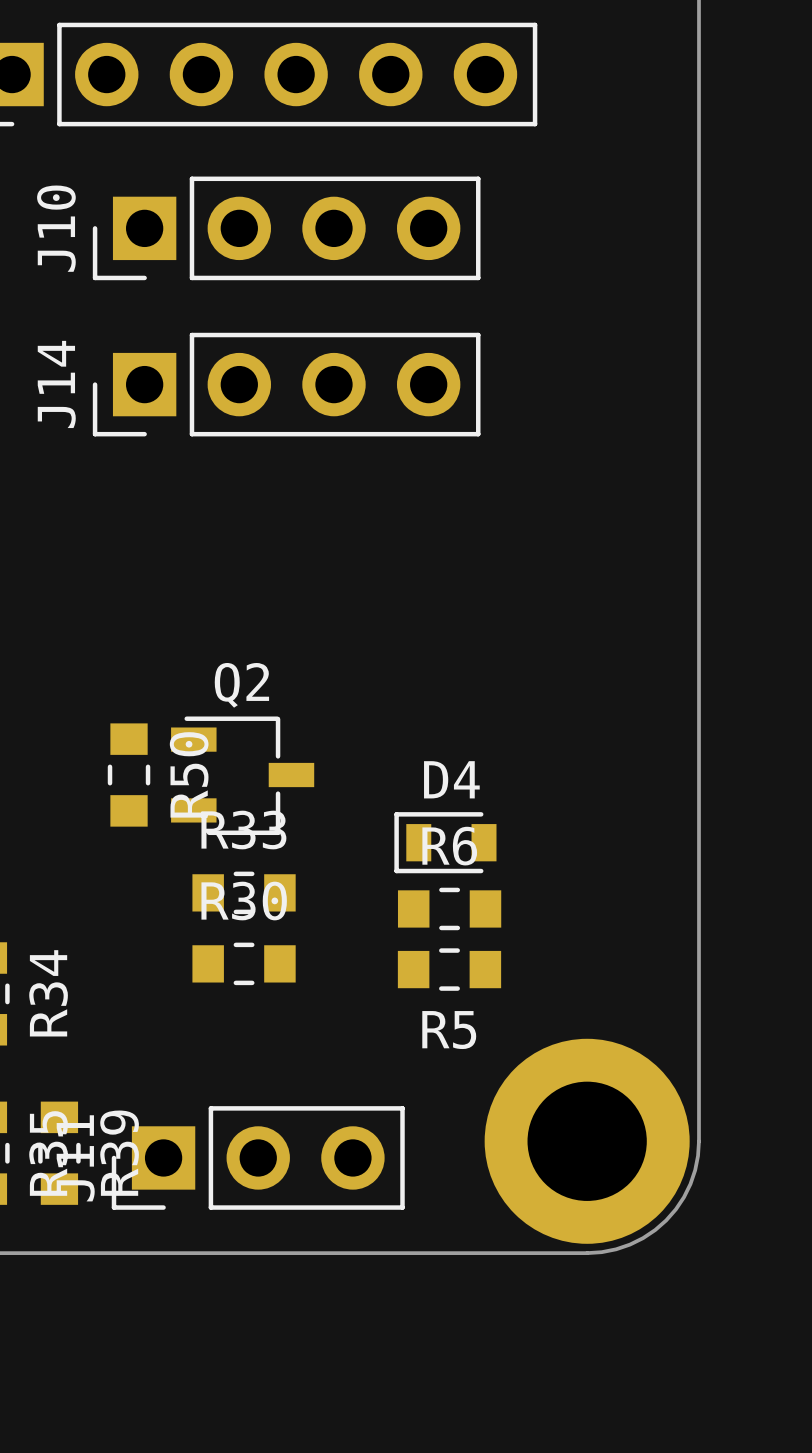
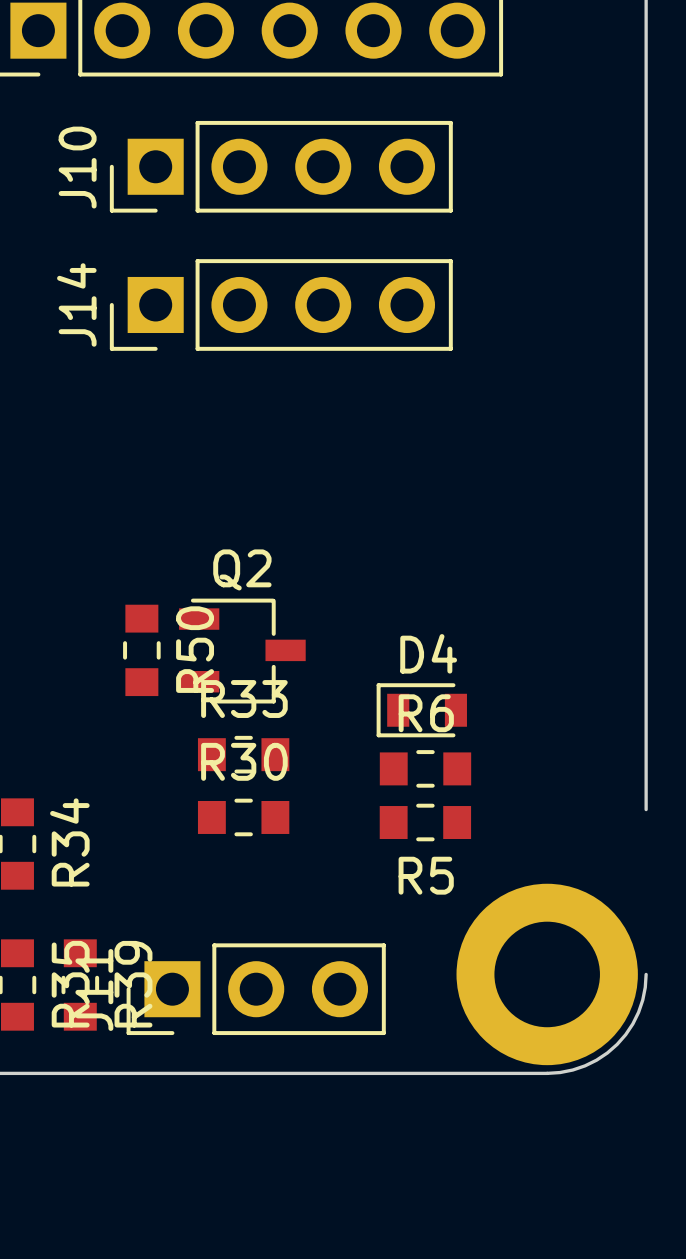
board edge: (698, 954) (698, 1141) -> none

